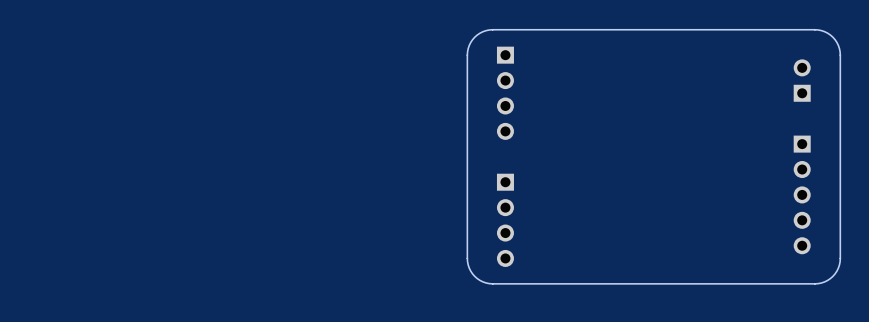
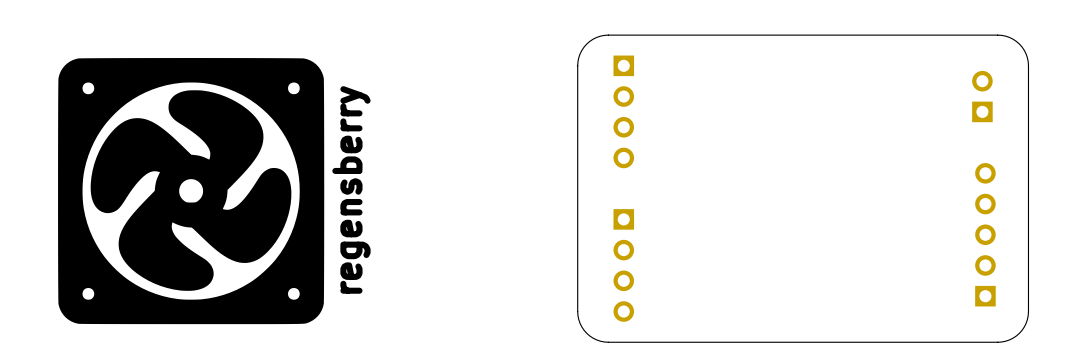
drawing: none -> [58, 58, 325, 325]
text: none -> regensberry (351, 189)
part rotation: 0° (802, 194) -> 180° (985, 234)

